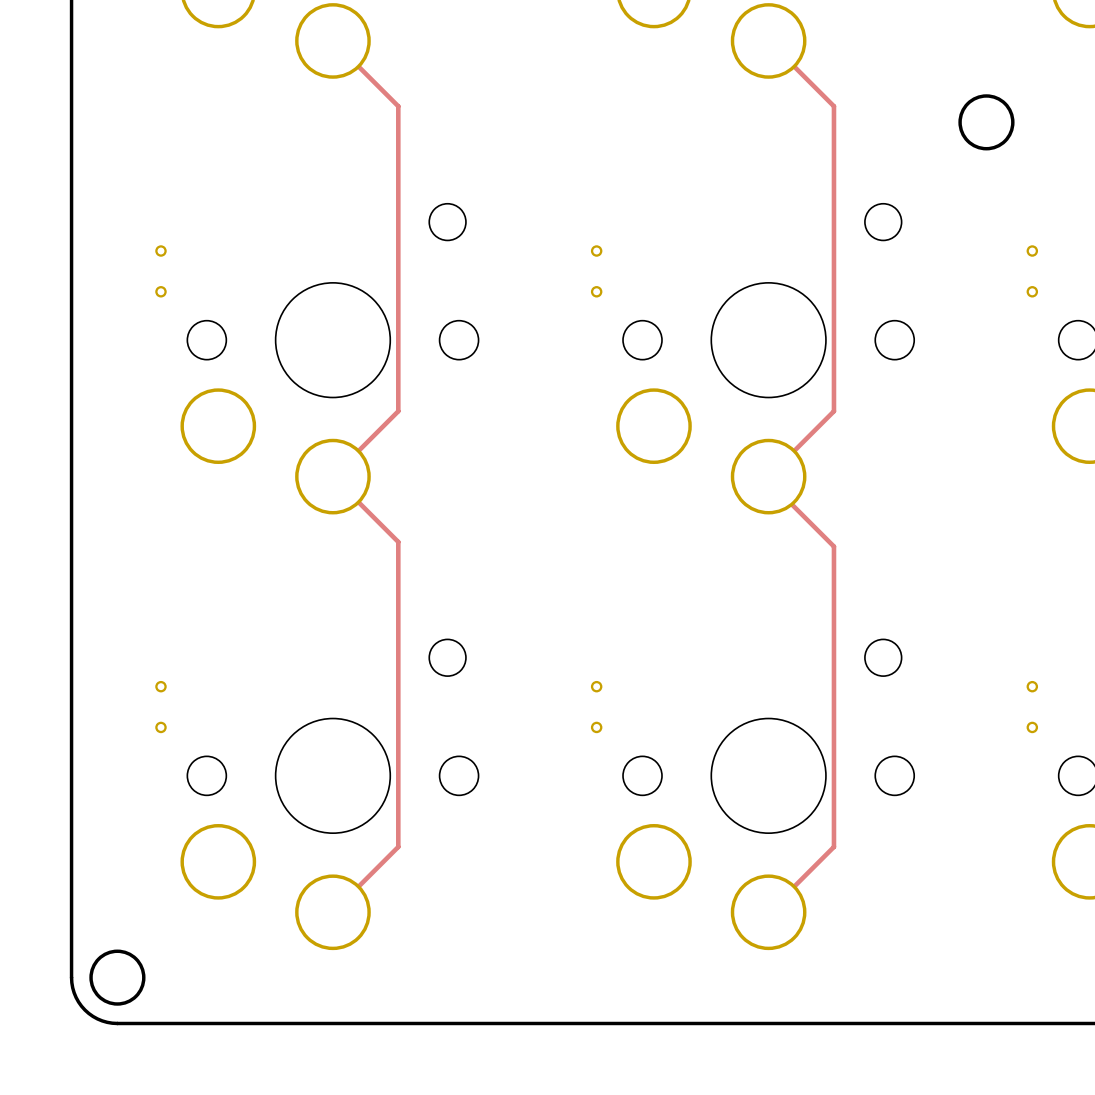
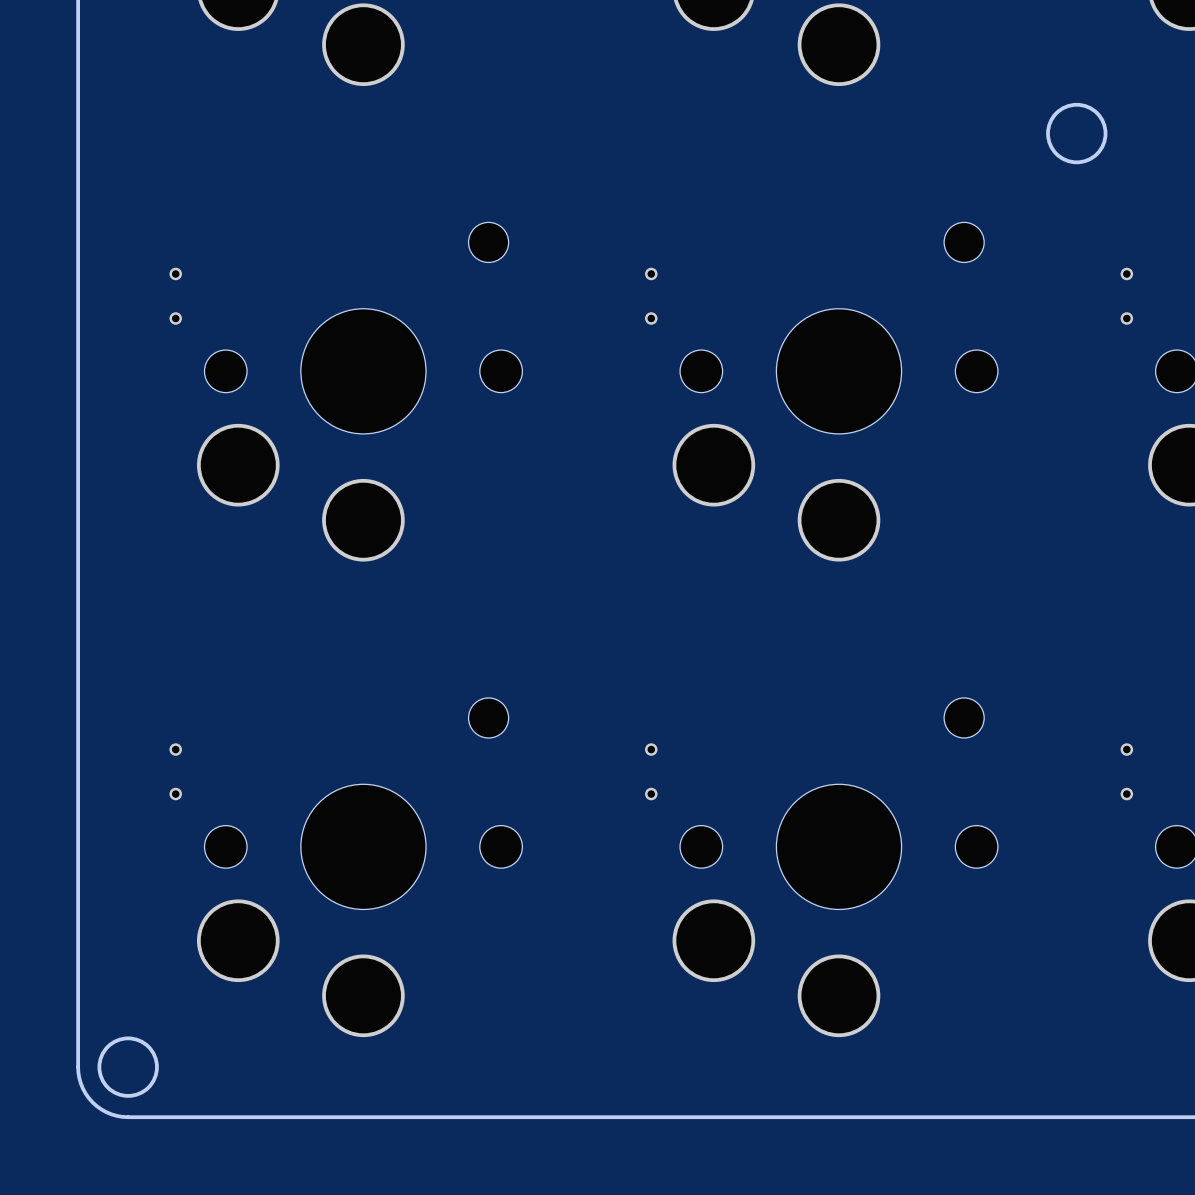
track: (332, 40) (398, 106) (398, 411) (332, 476) (398, 541) (398, 846) (332, 912) -> none
track: (768, 40) (833, 106) (833, 411) (768, 476) (768, 481) (833, 546) (833, 846) (768, 912) -> none

